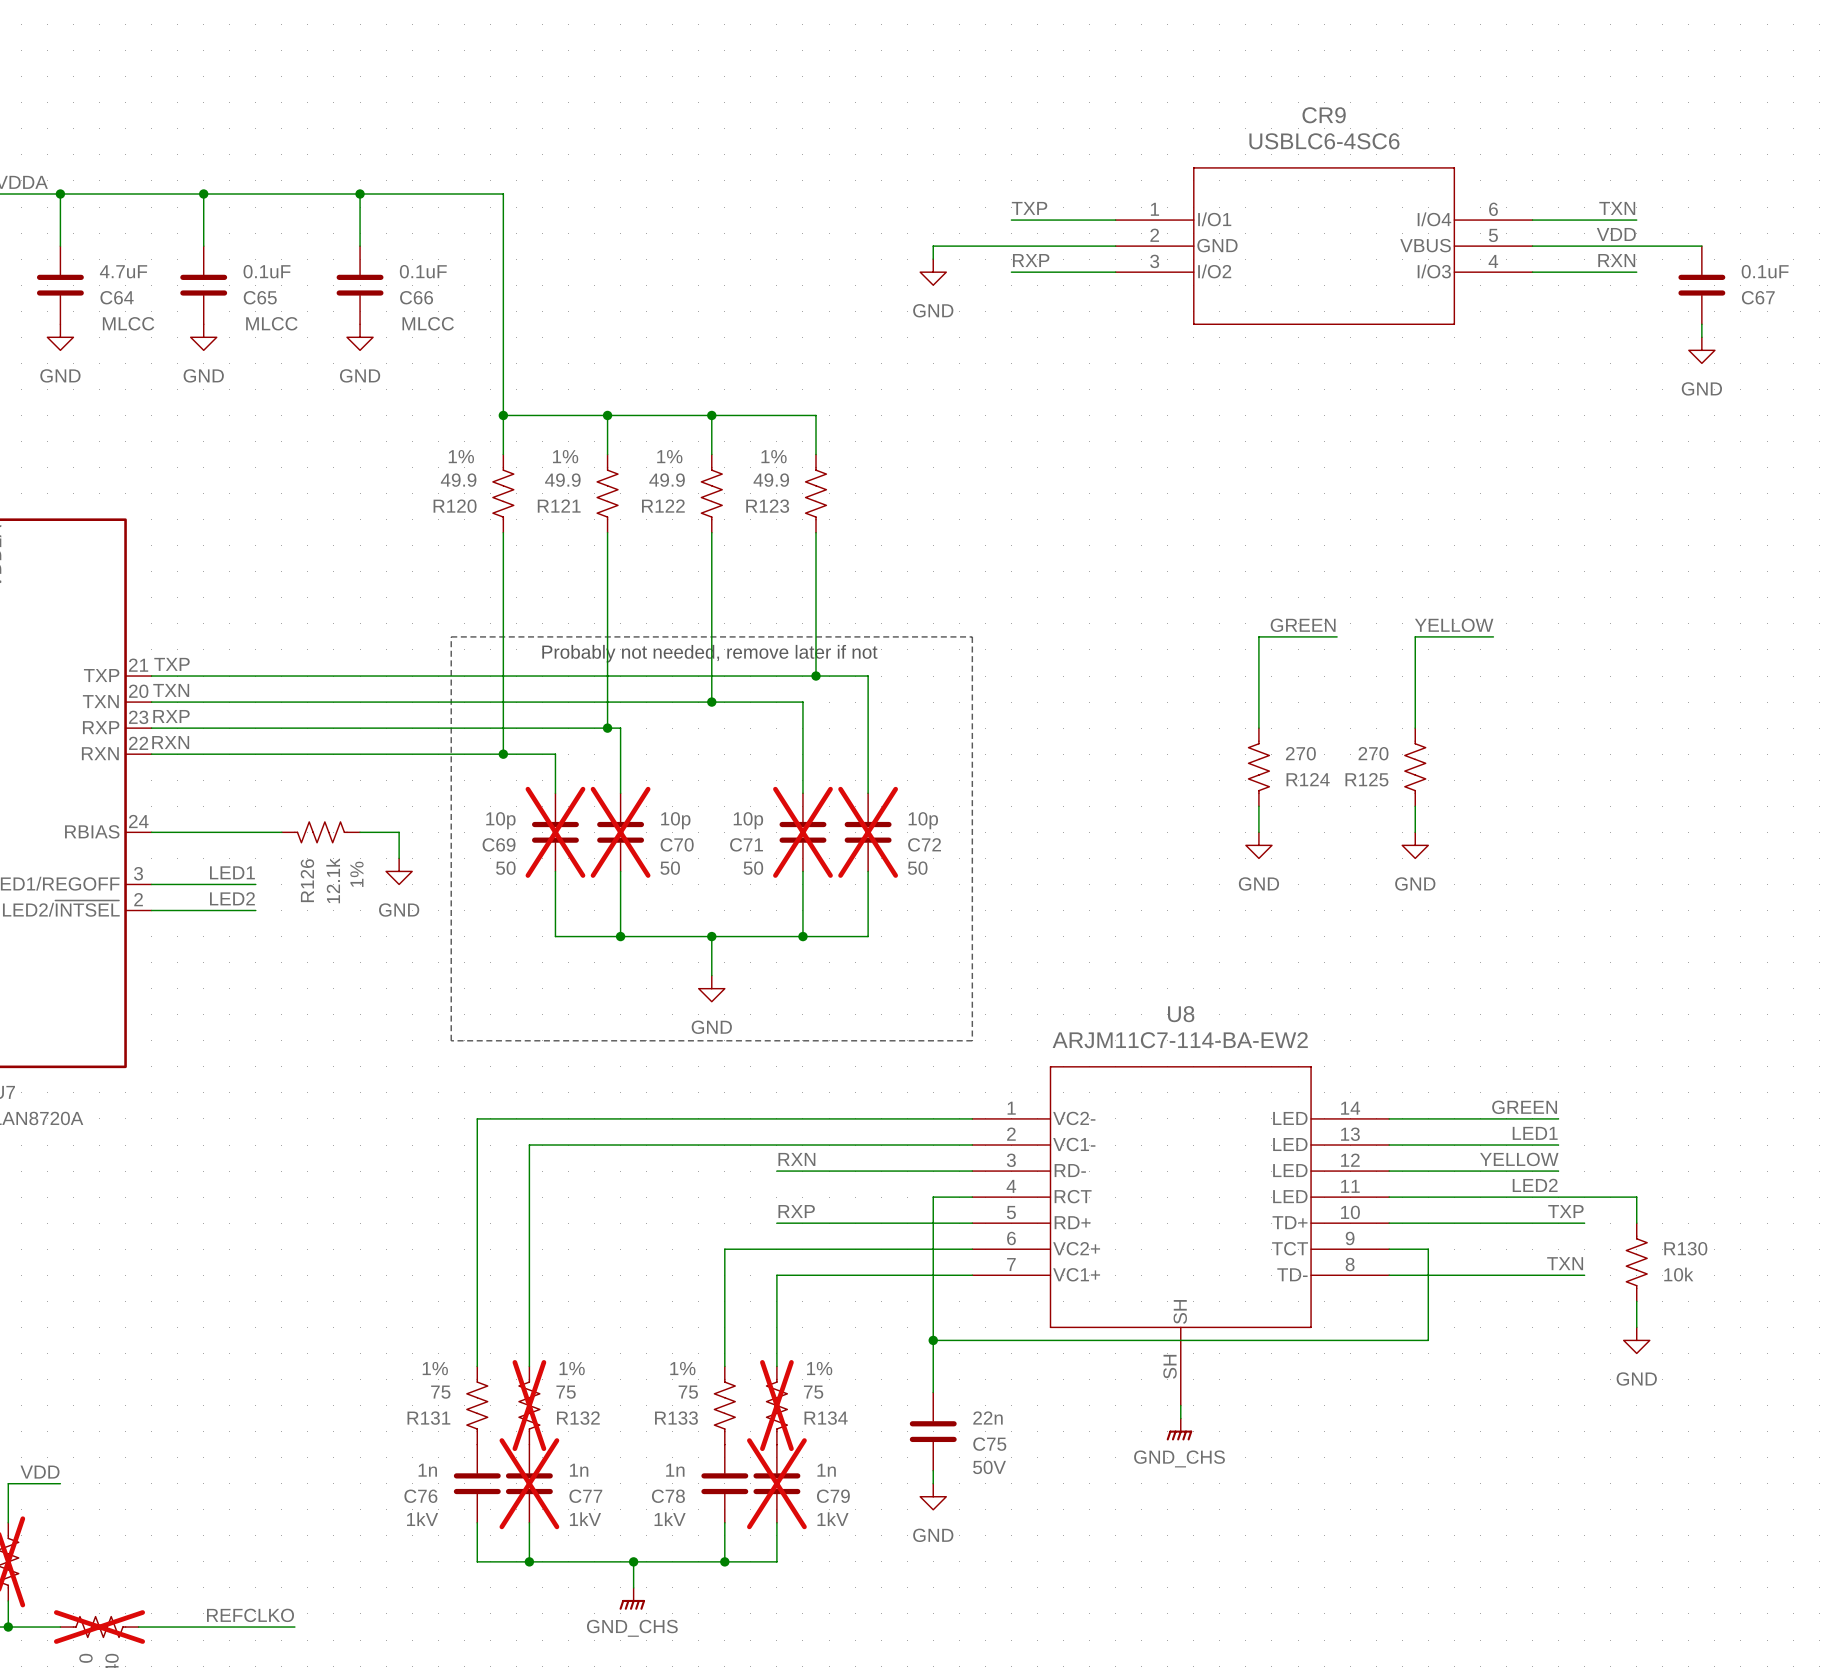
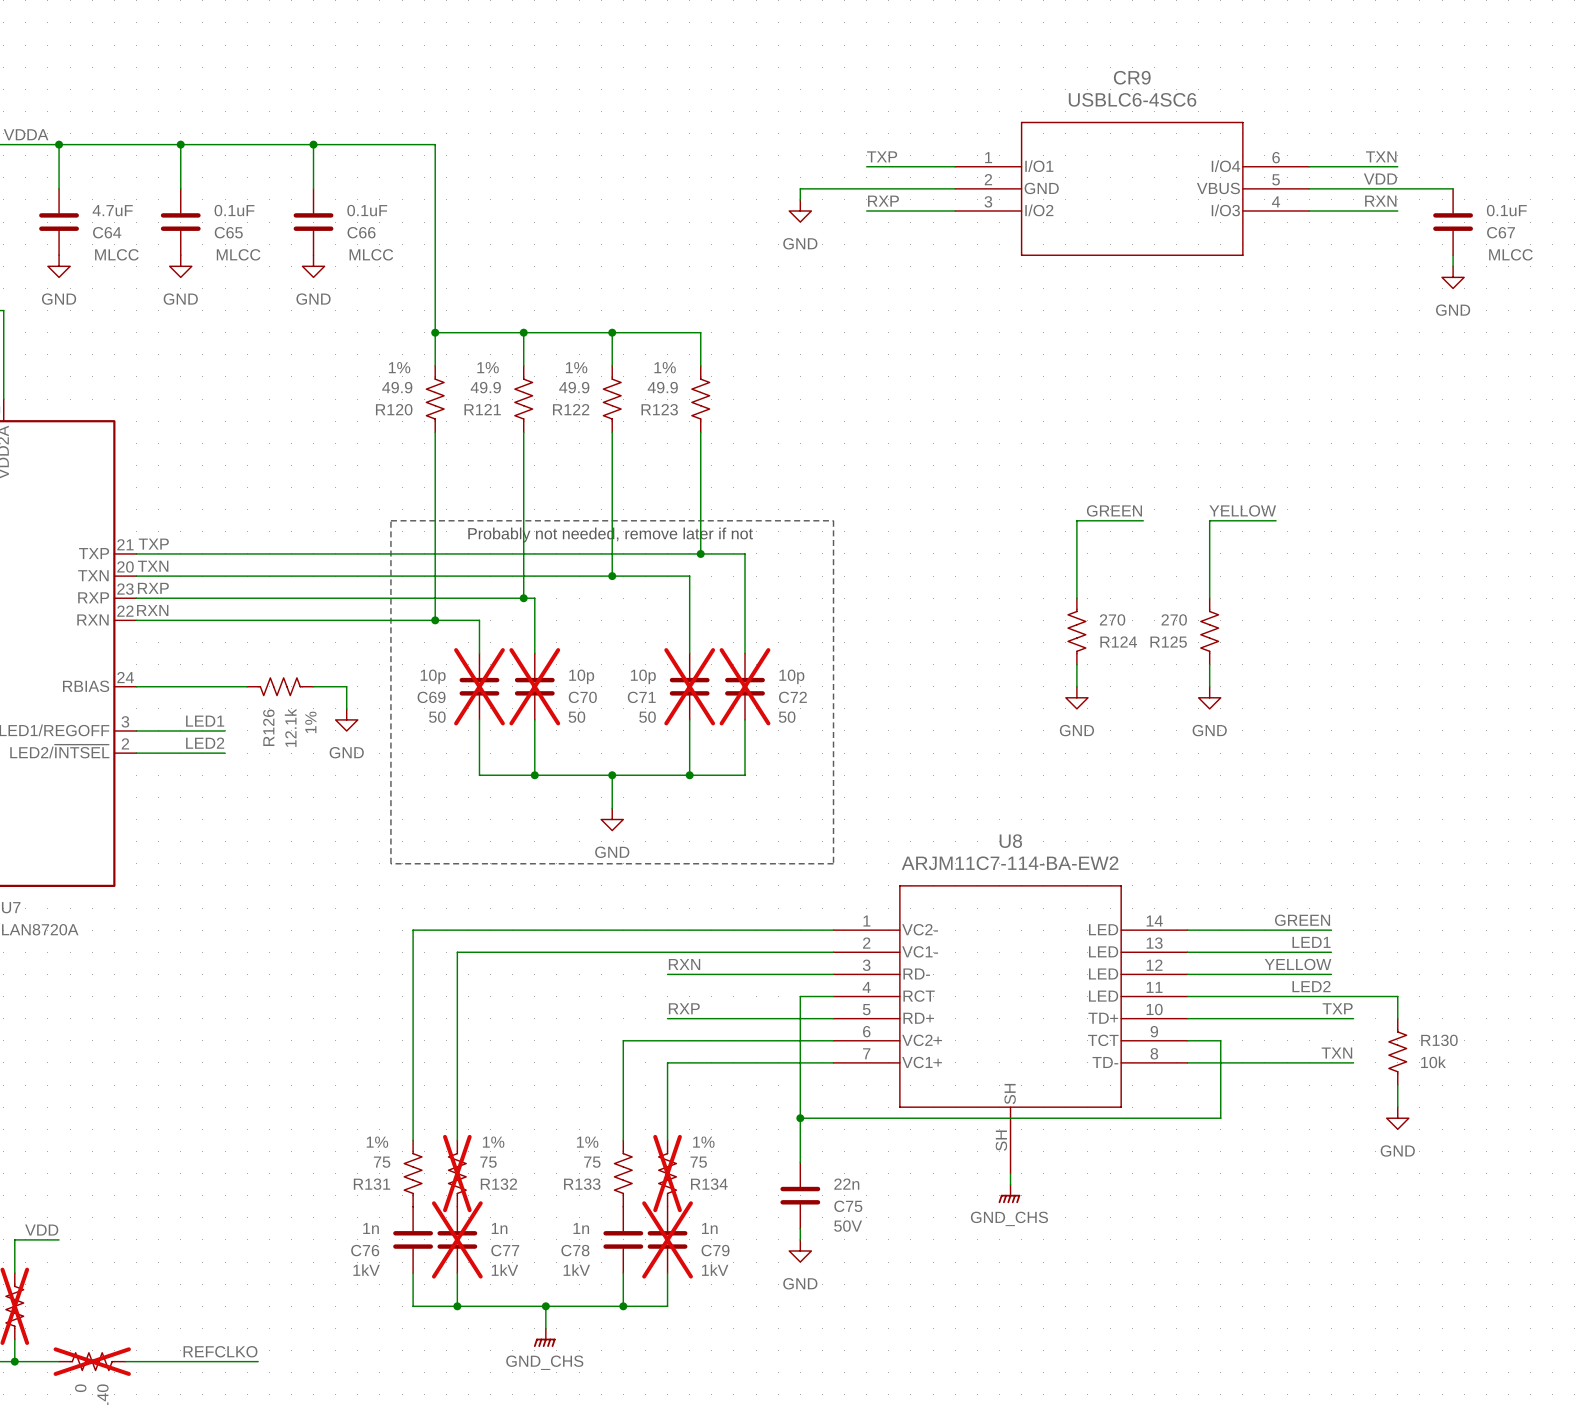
C67 text: none -> MLCC (1510, 254)

